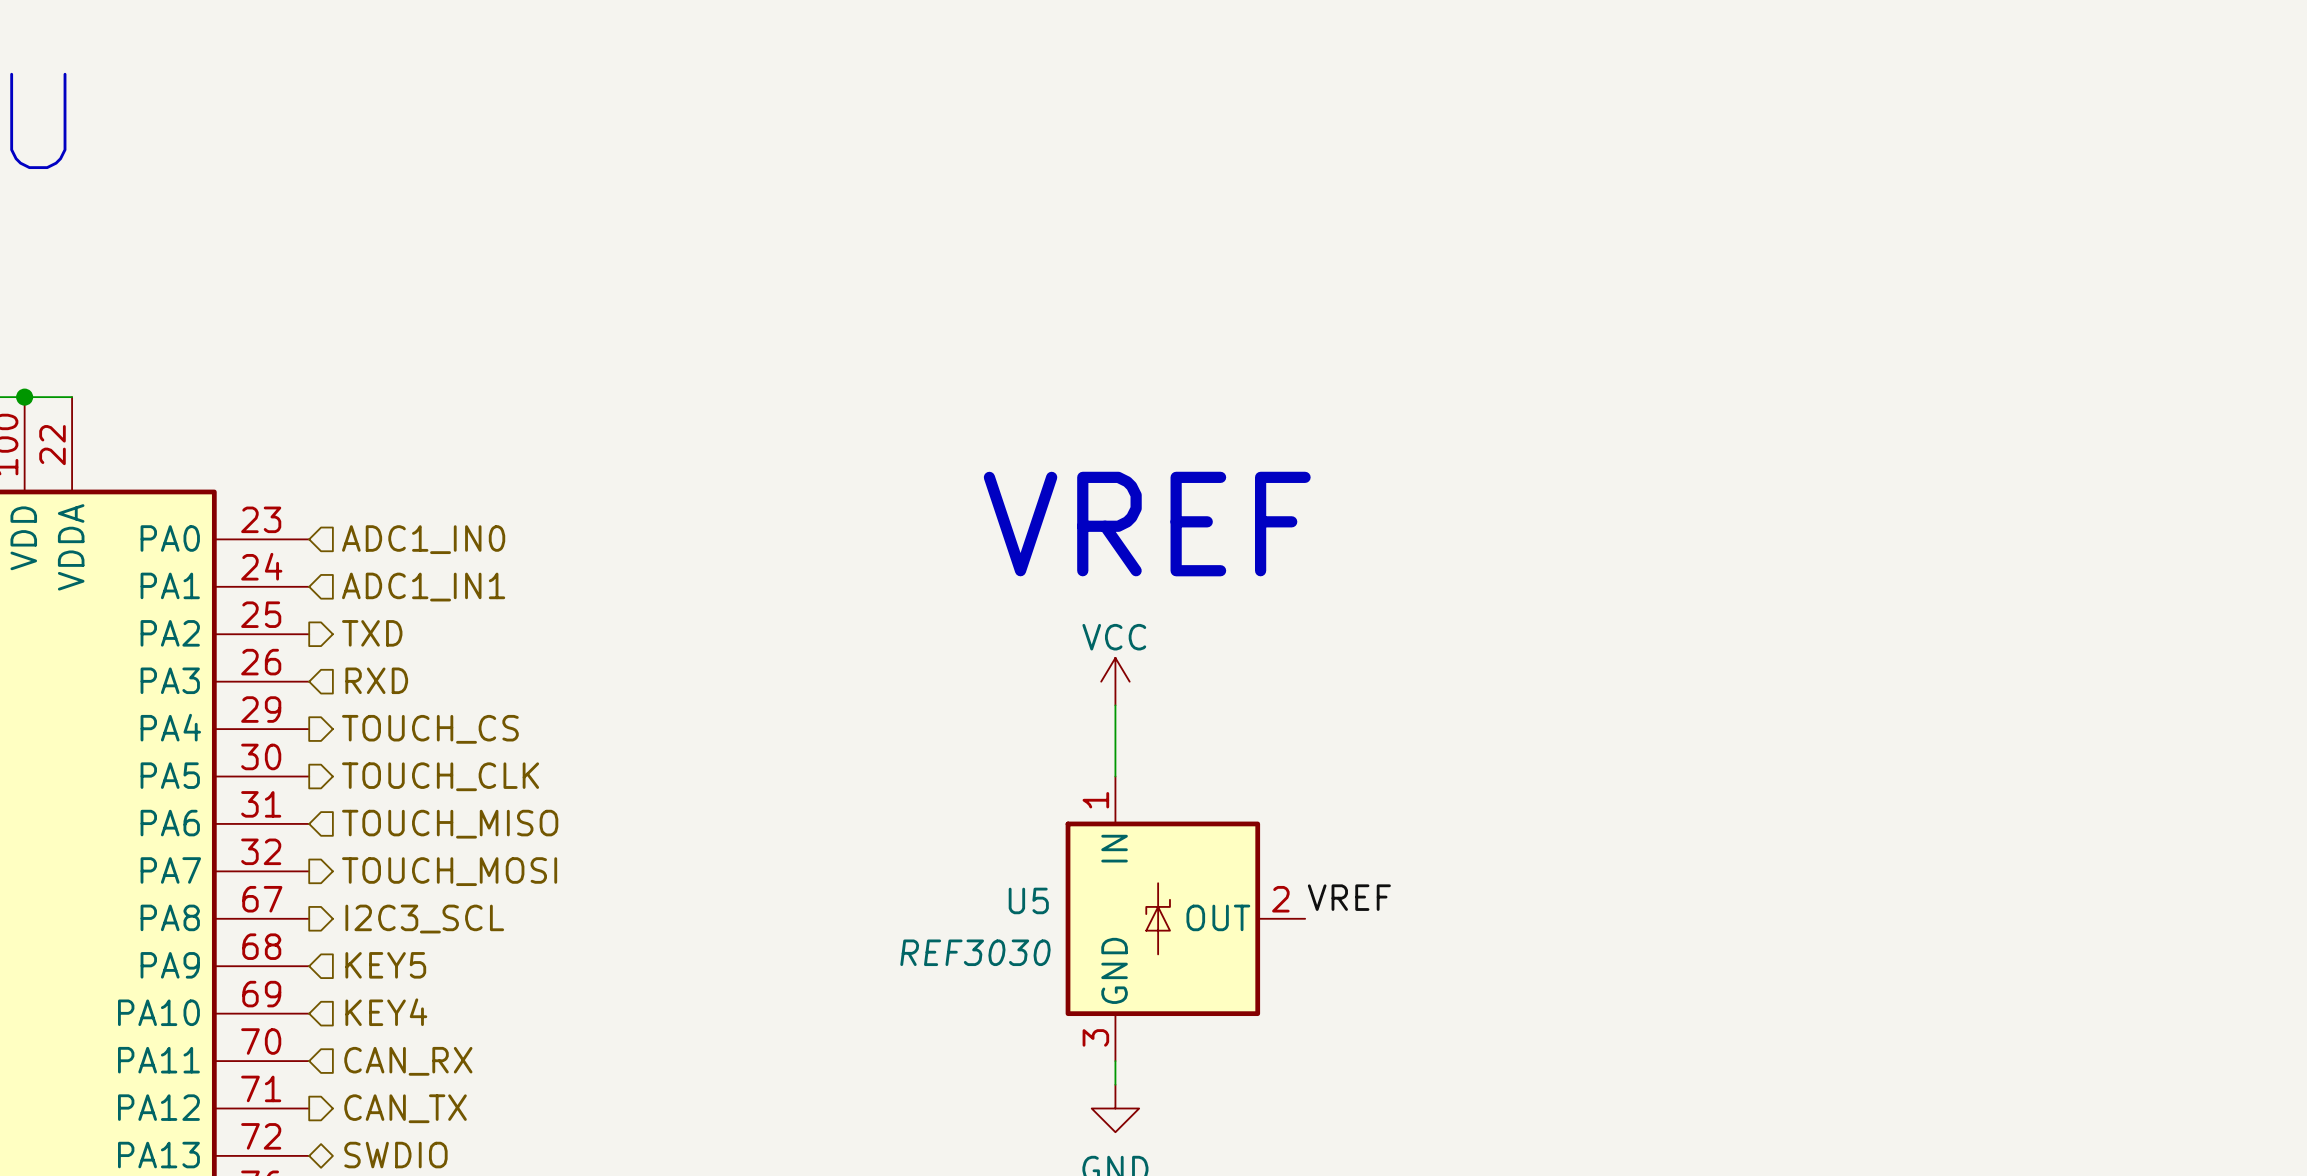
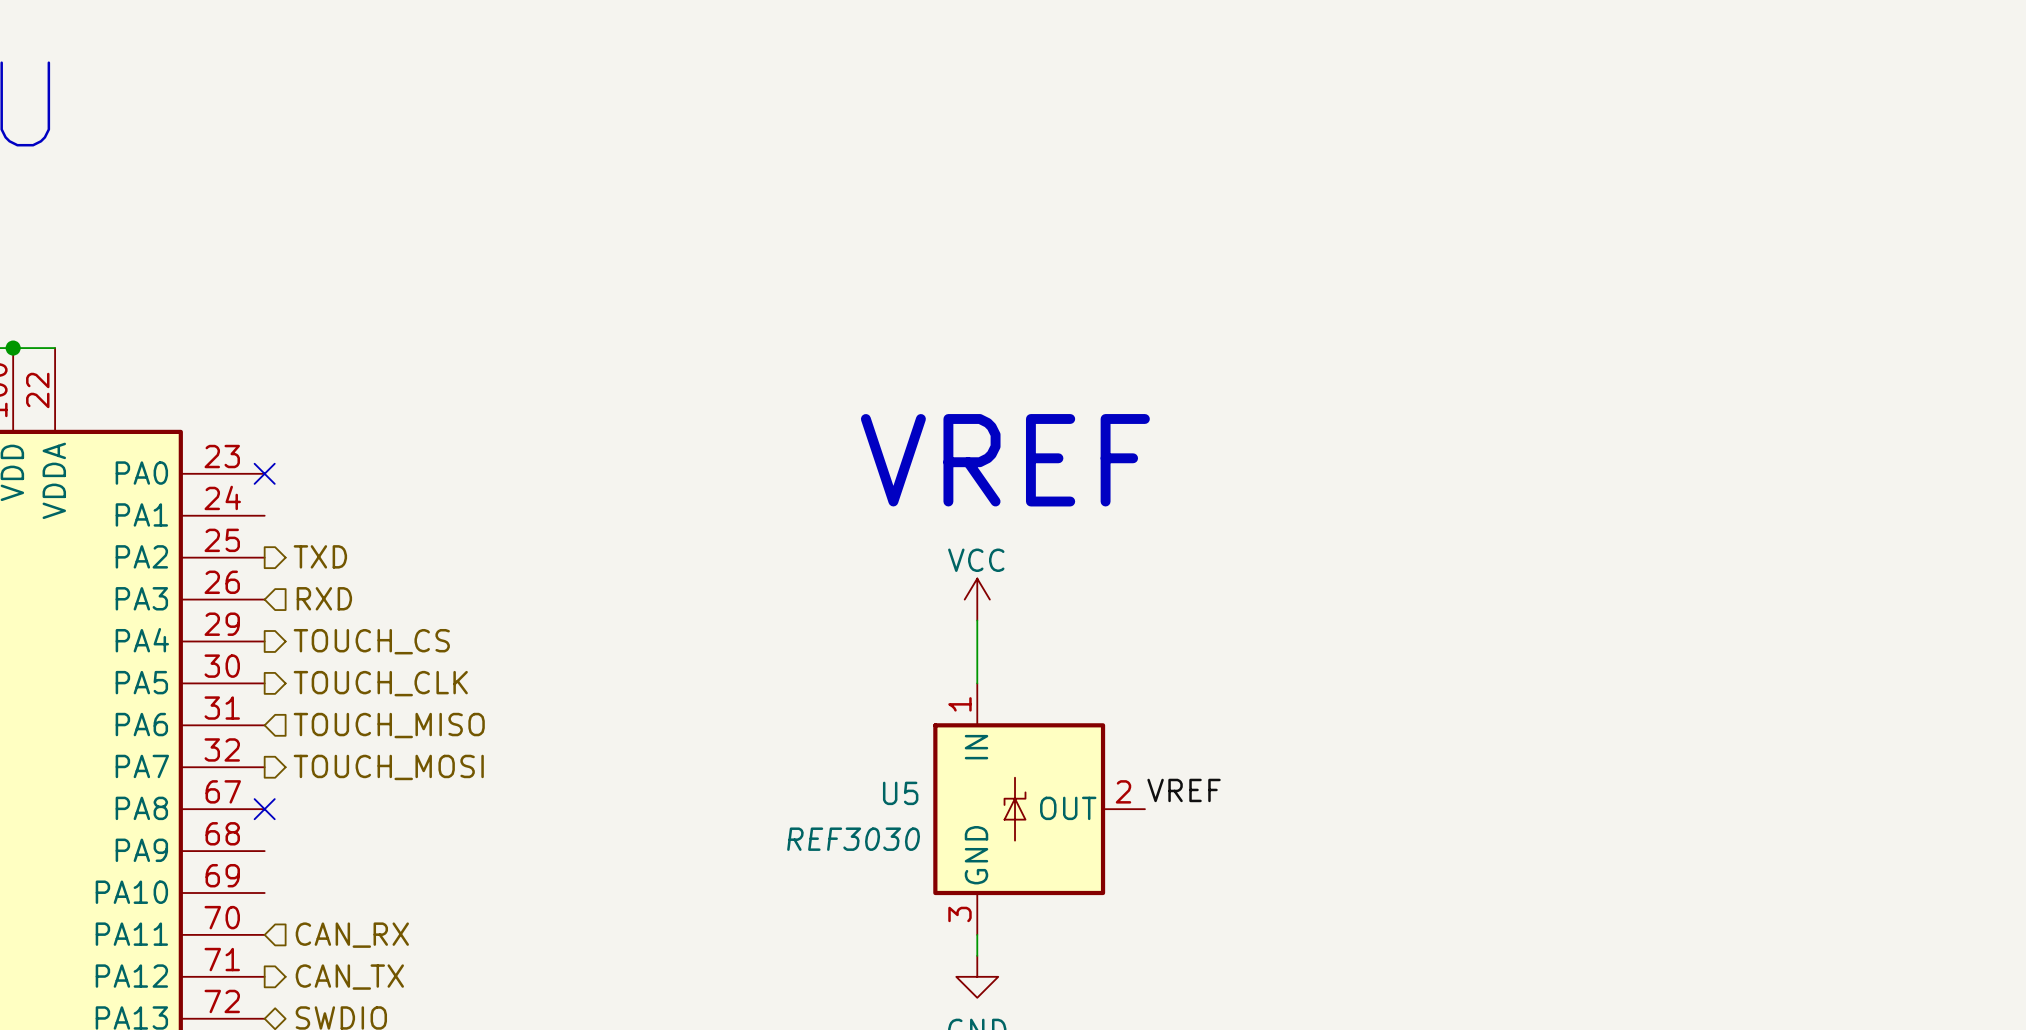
no-connect mark: none -> (264, 473)
hierarchical label: ADC1_IN0 (423, 539) -> none
hierarchical label: ADC1_IN1 (423, 587) -> none
no-connect mark: none -> (264, 809)
hierarchical label: I2C3_SCL (424, 919) -> none
hierarchical label: KEY5 (385, 965) -> none
hierarchical label: KEY4 (386, 1012) -> none

